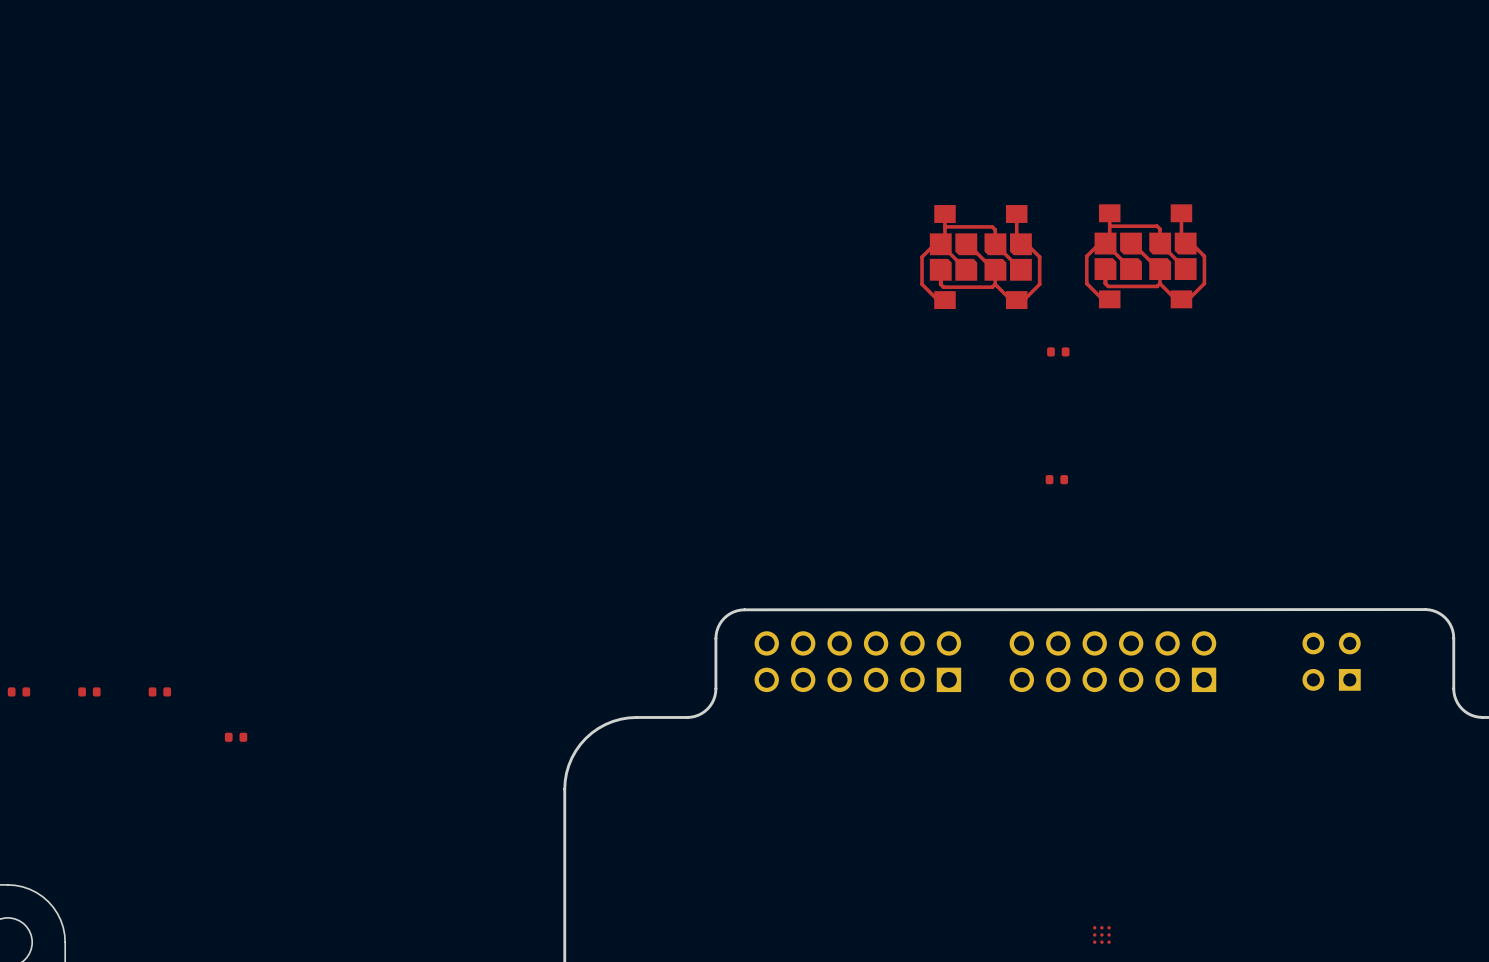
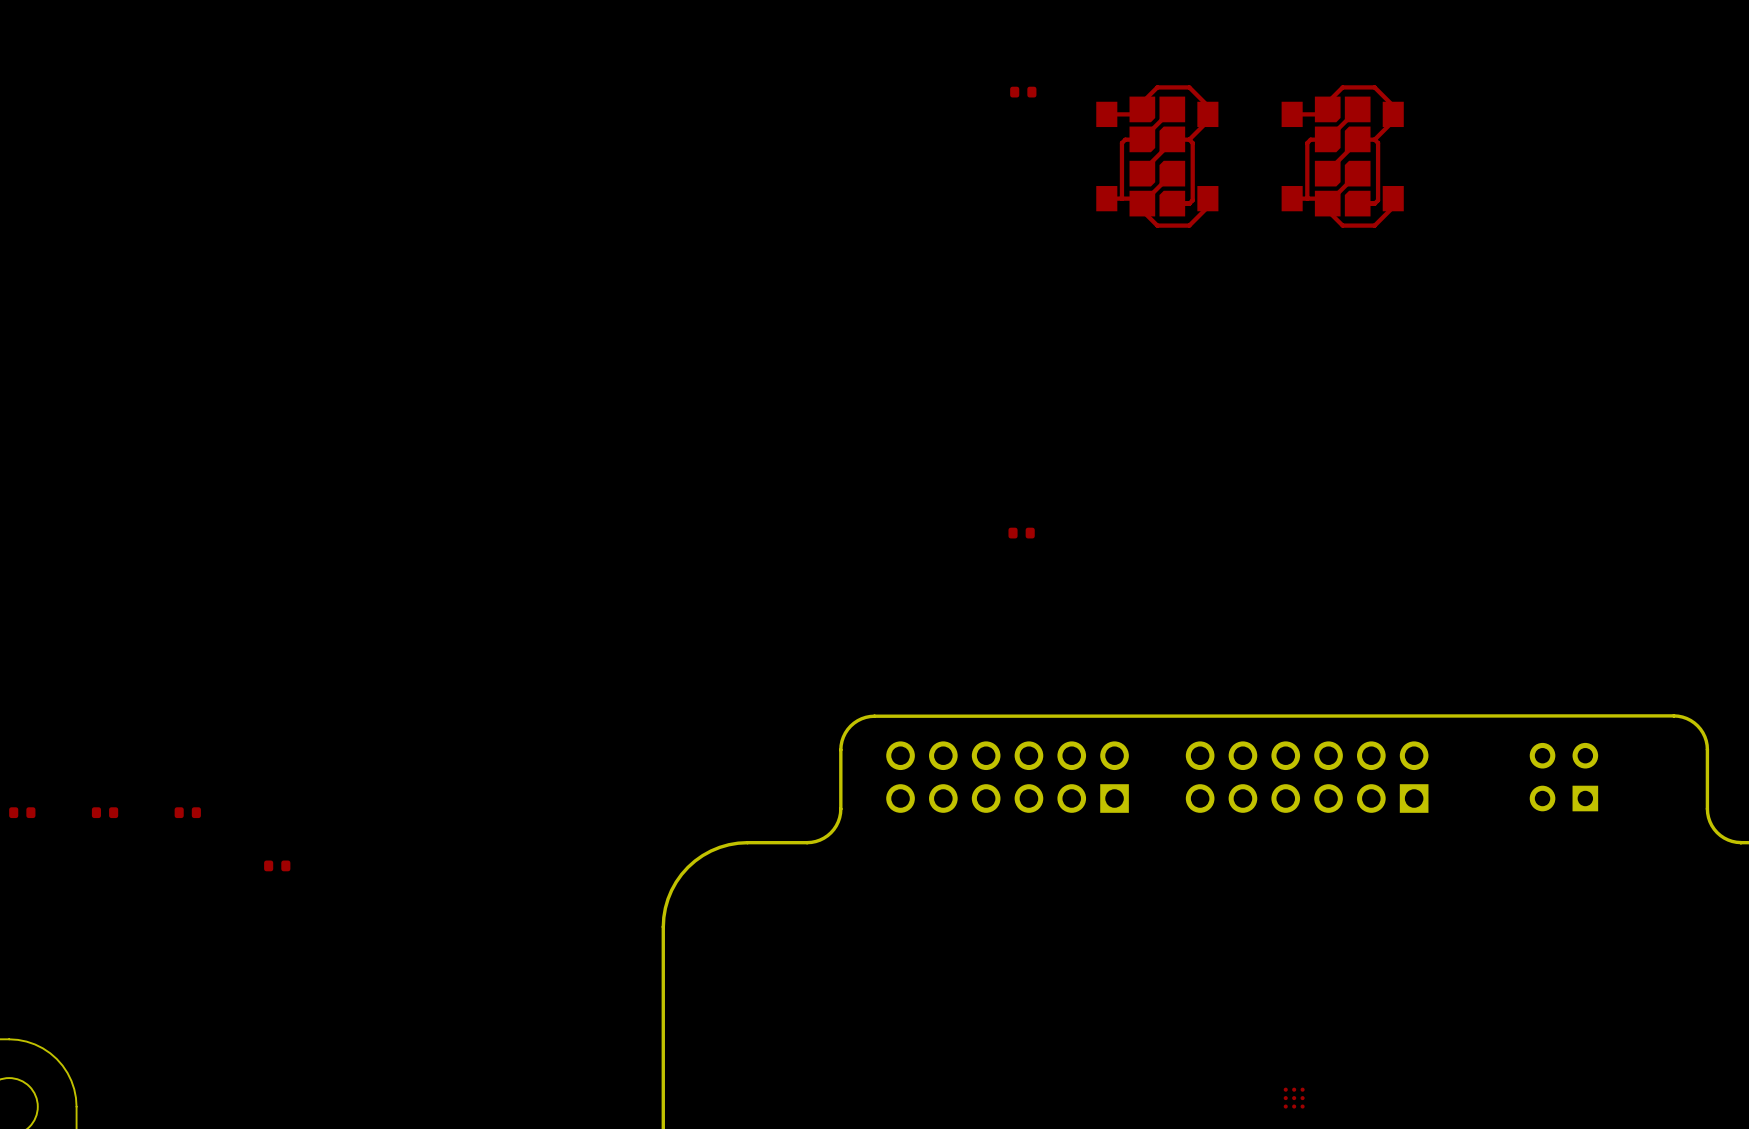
part: none -> (1023, 92)
part: none -> (1157, 156)
part: none -> (1342, 156)
part: (1145, 256) -> none
part: (980, 257) -> none
part: (1058, 351) -> none
part: none -> (1021, 533)
part: (1056, 479) -> none

